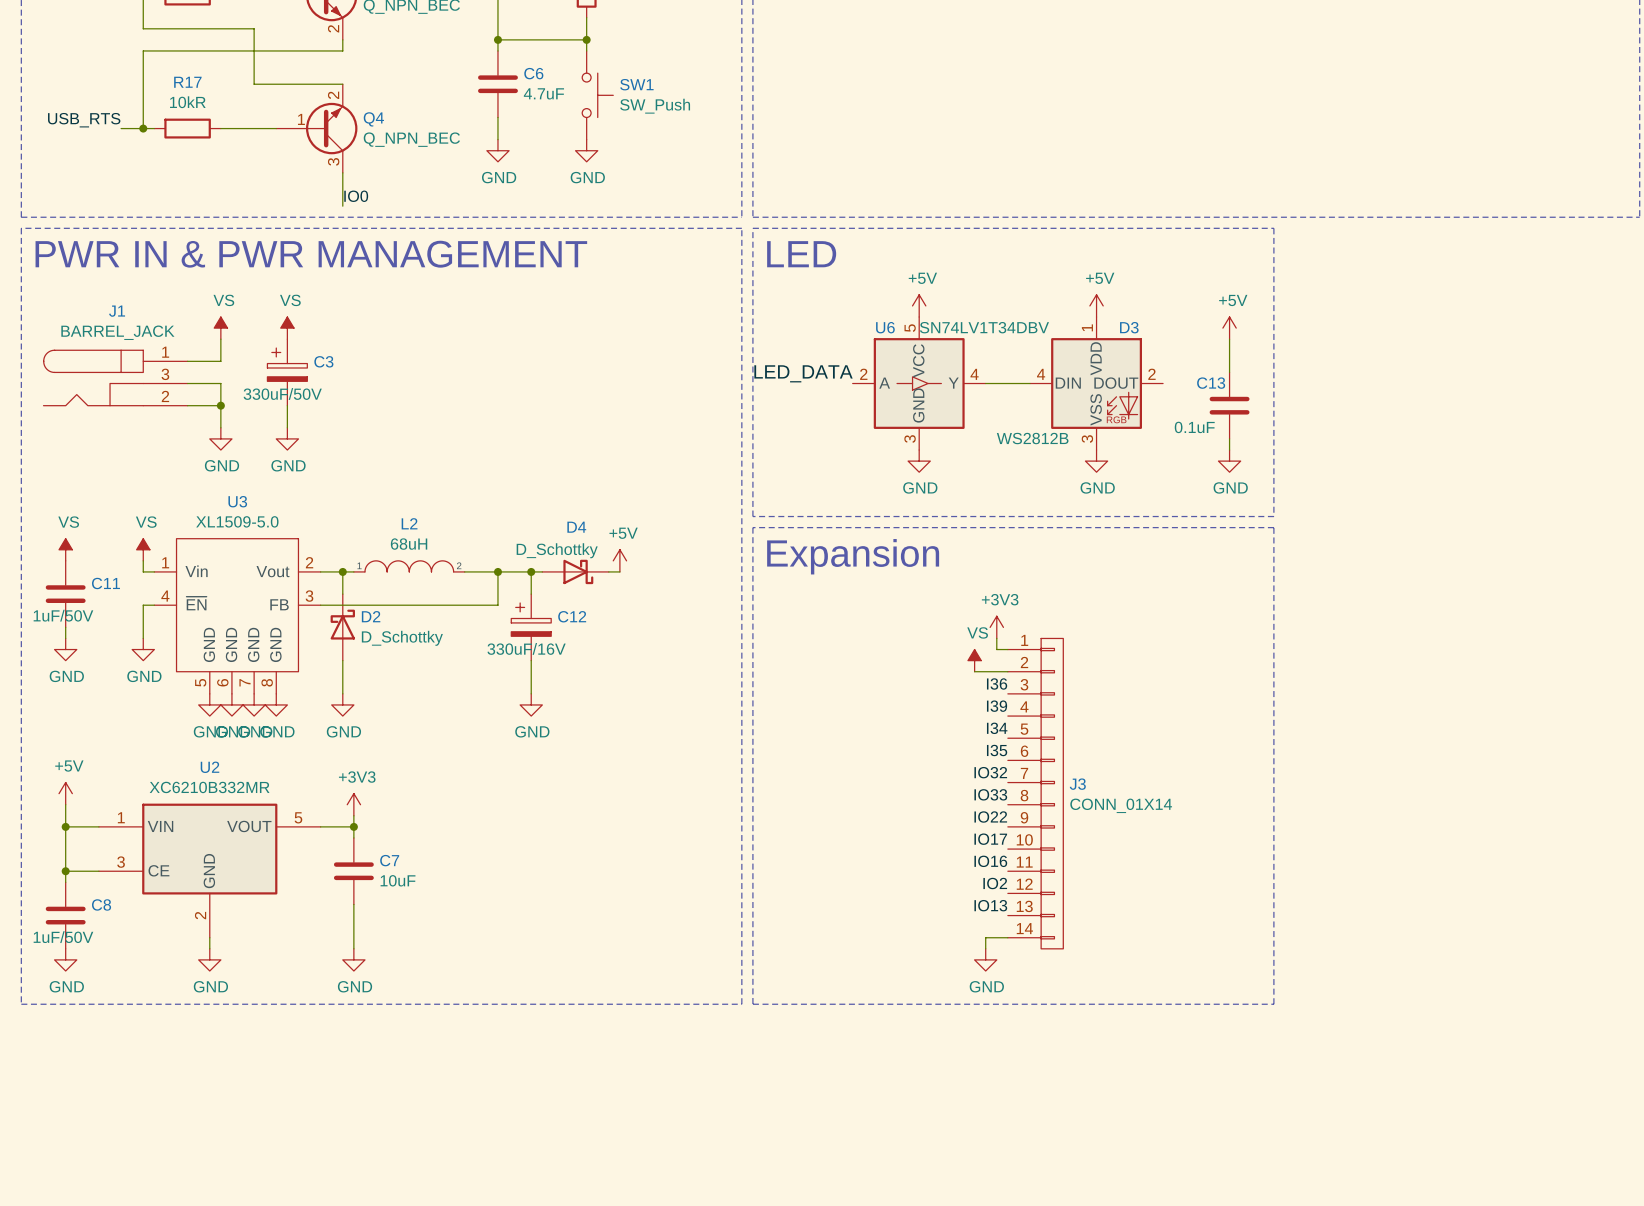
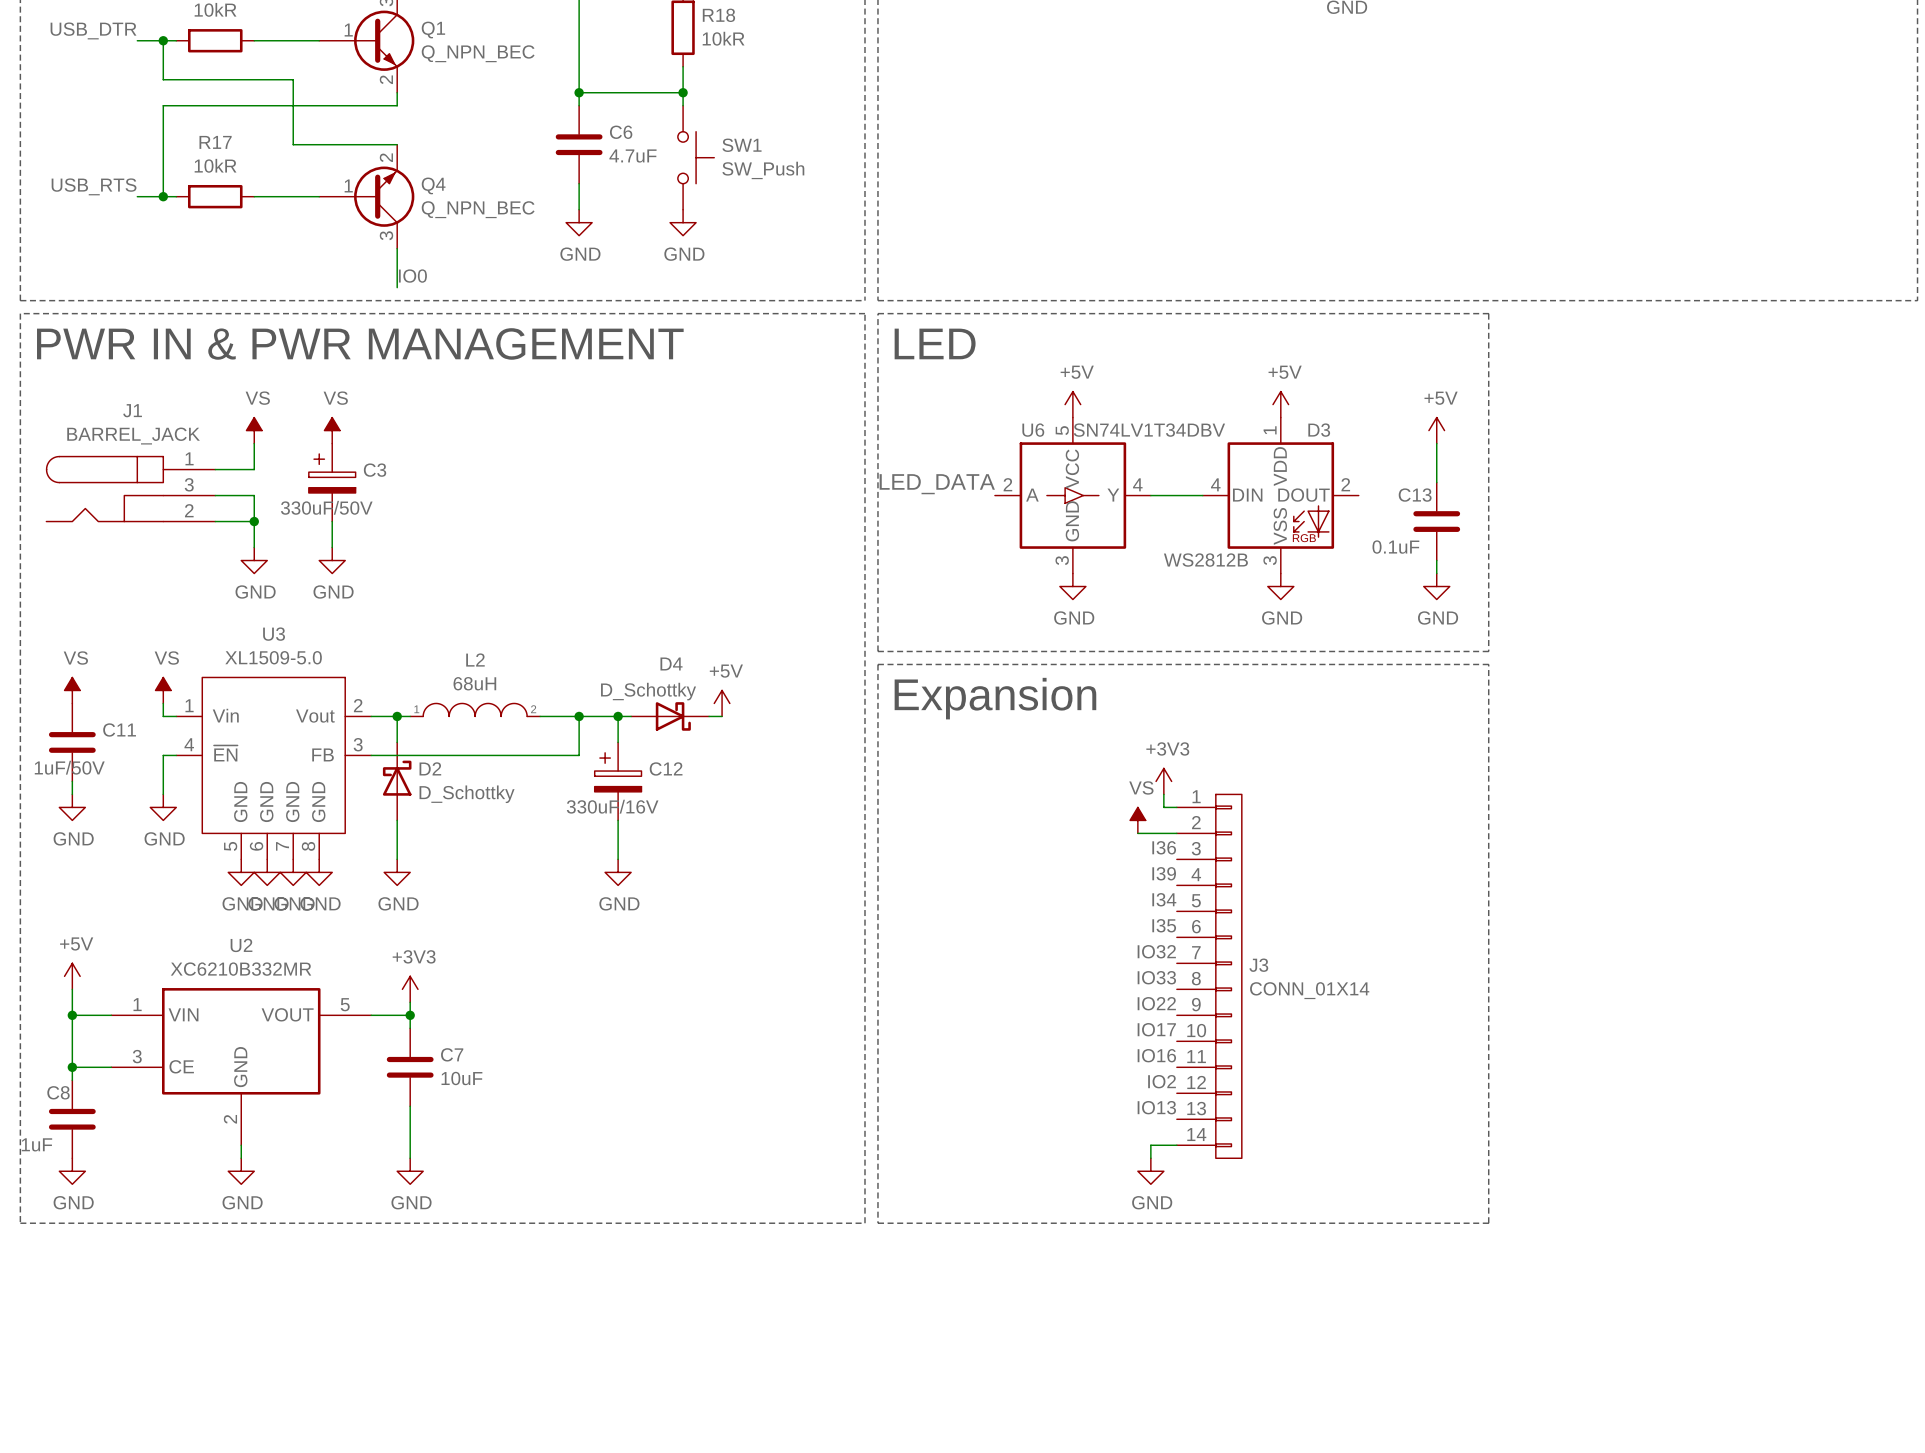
C8 name position: C8 (101, 904) -> C8 (58, 1092)
C8 value: 1uF/50V (63, 937) -> 1uF (36, 1144)

